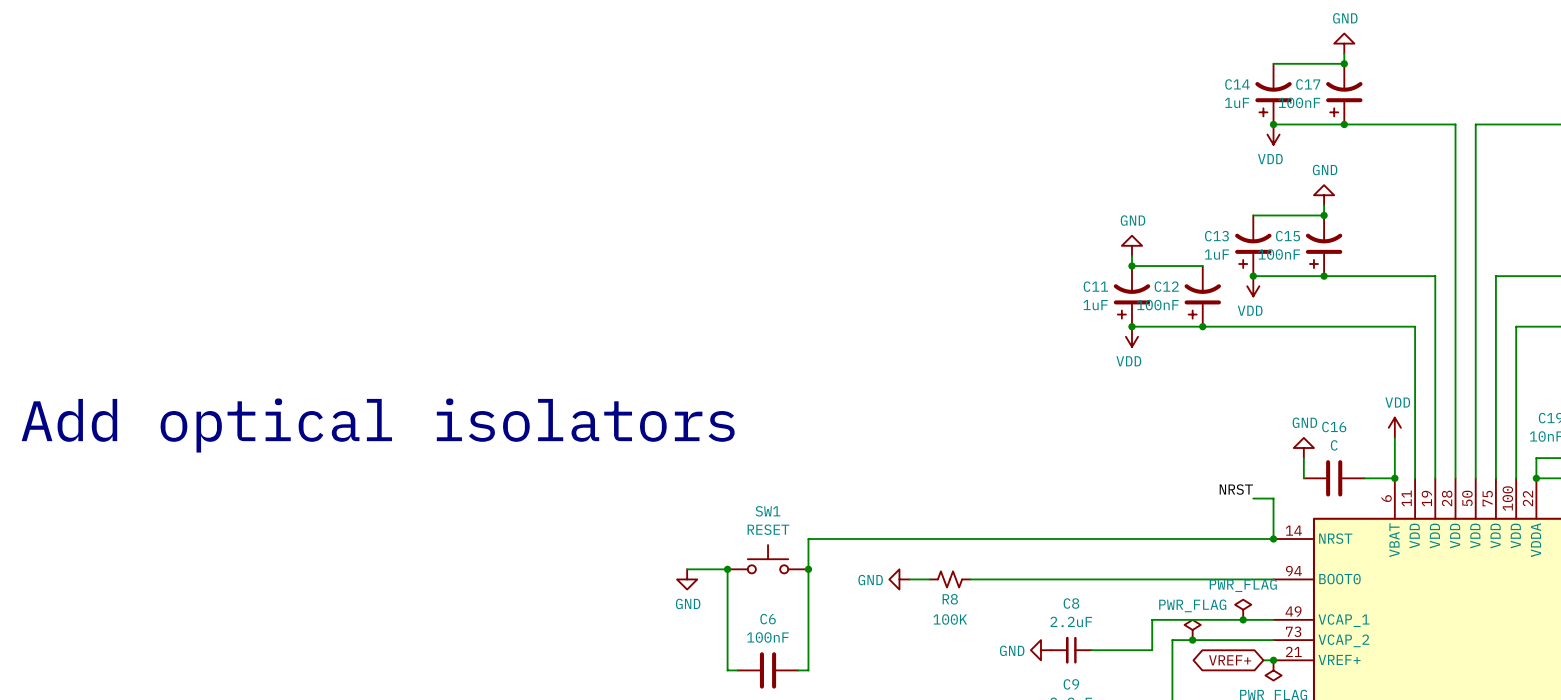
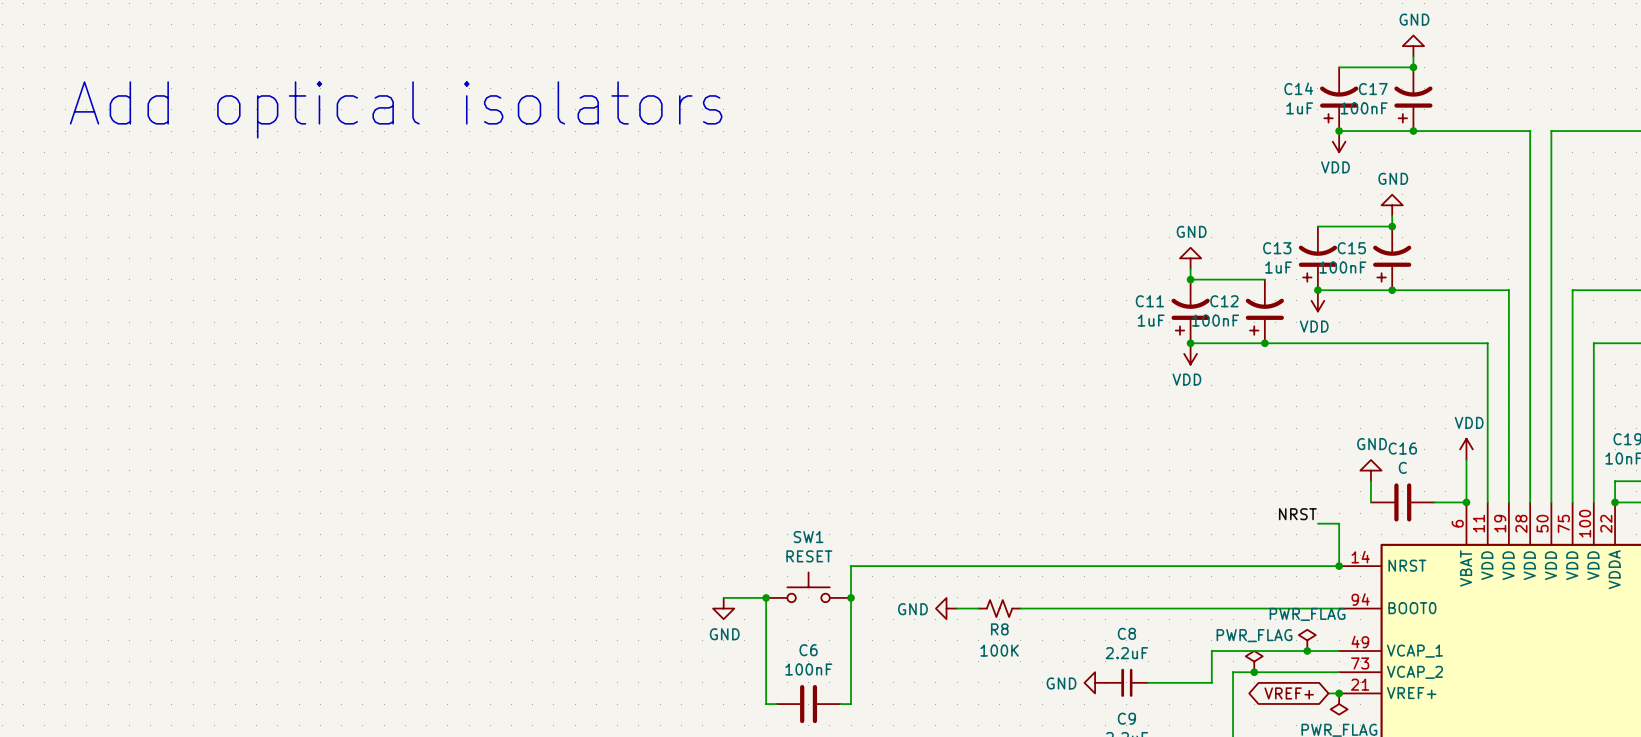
text: none -> Add optical isolators (396, 109)
text: Add optical isolators (378, 425) -> none

